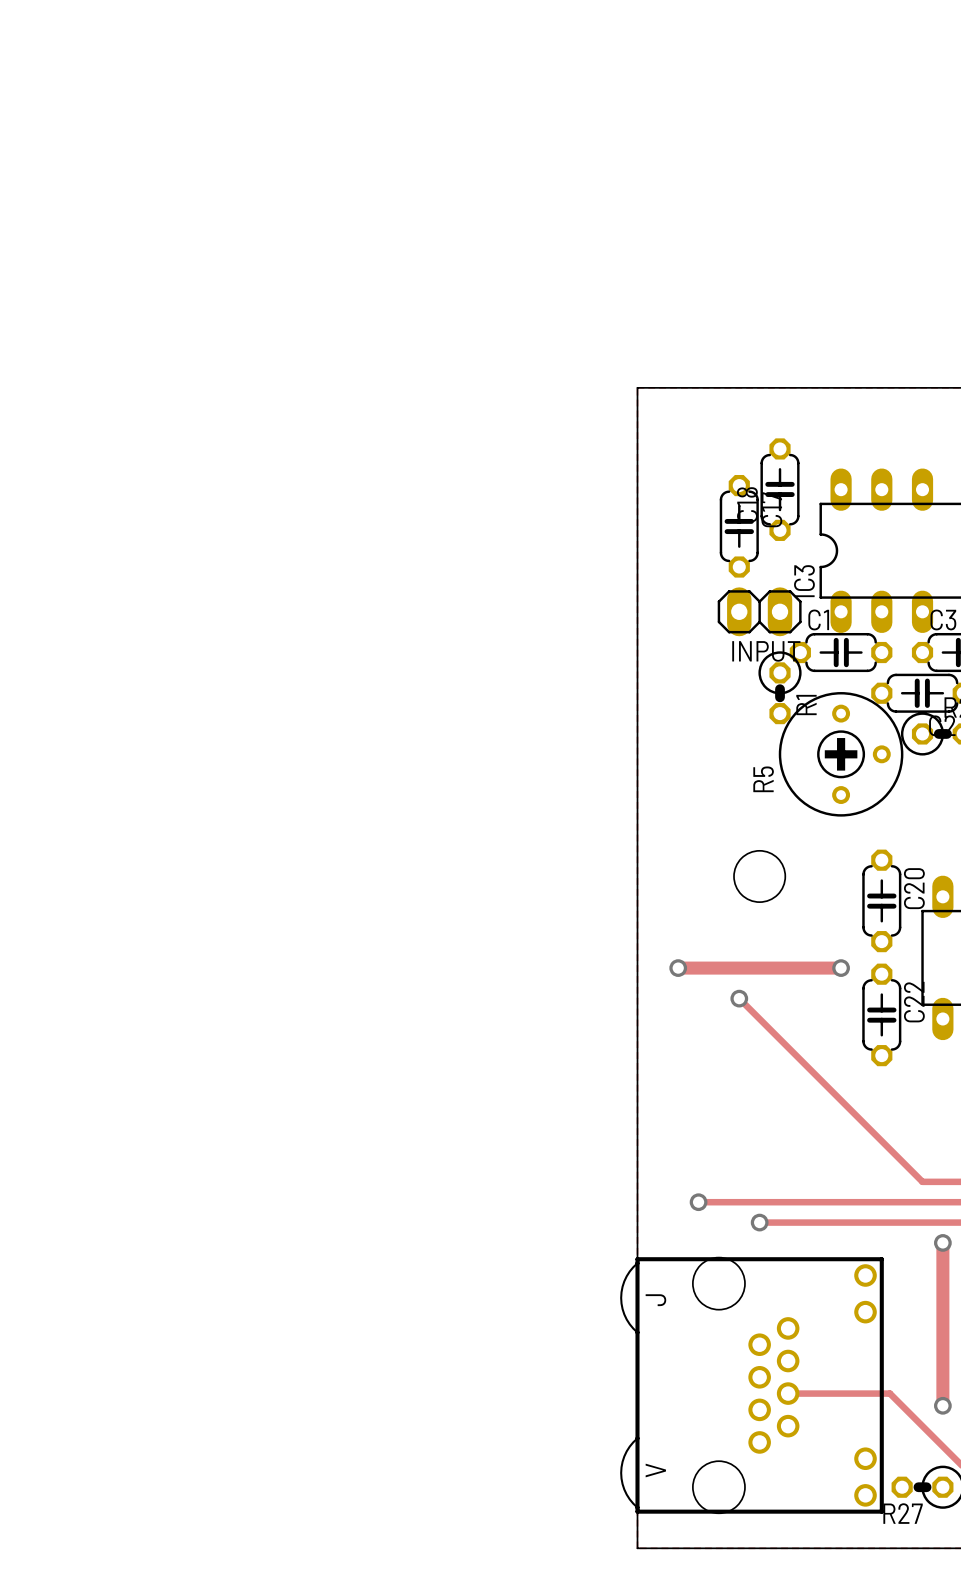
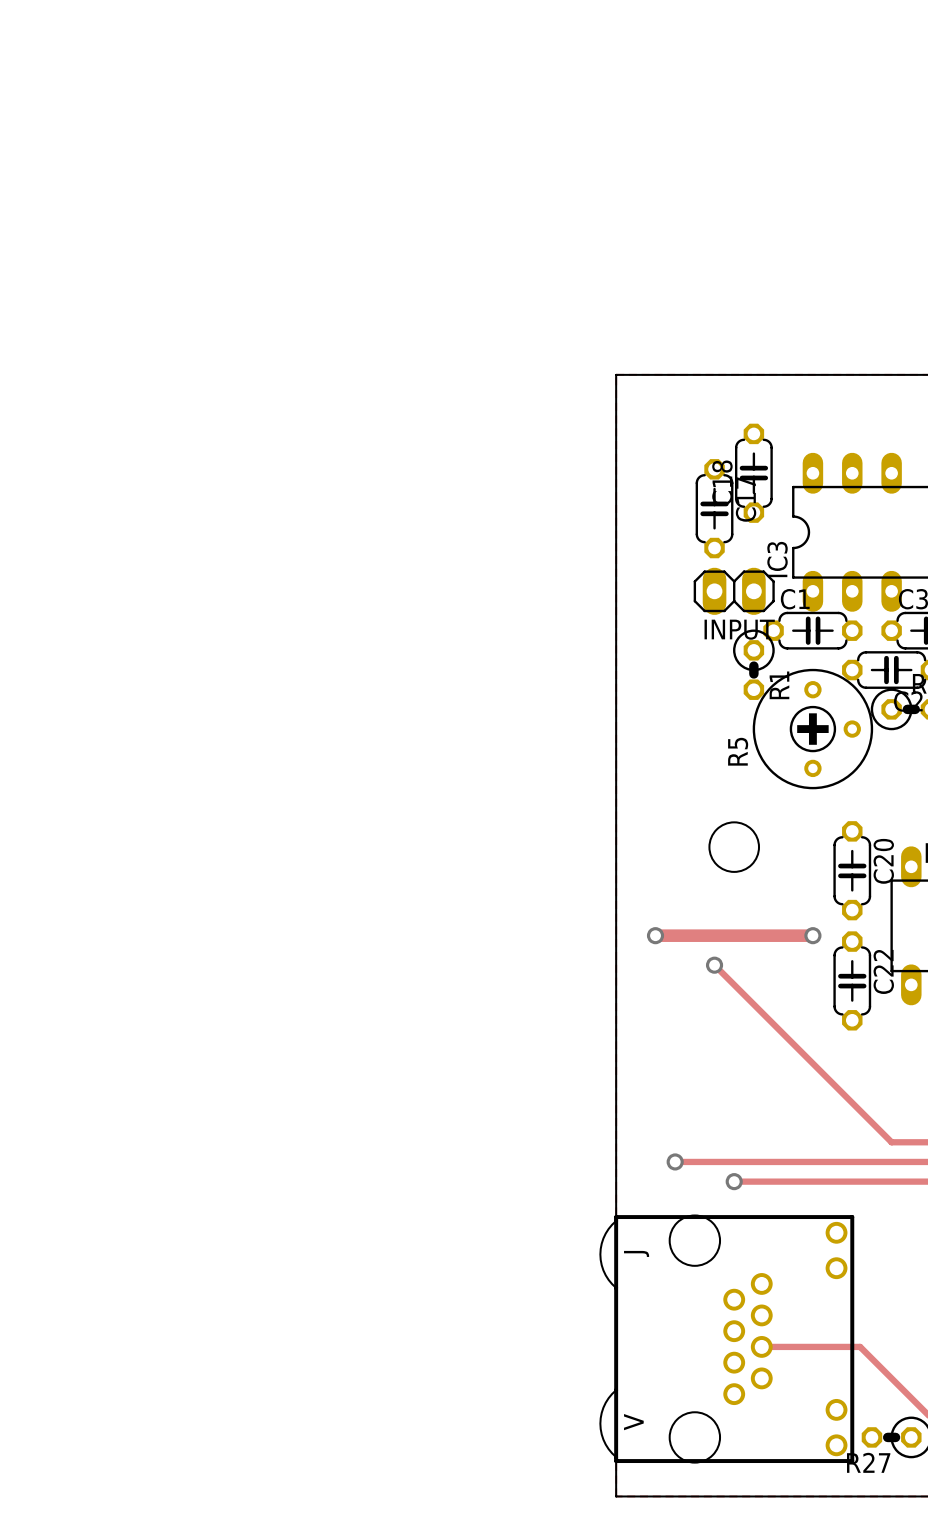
track: (942, 1242) (942, 1405) -> none
via: (942, 1242) -> none
via: (942, 1405) -> none

